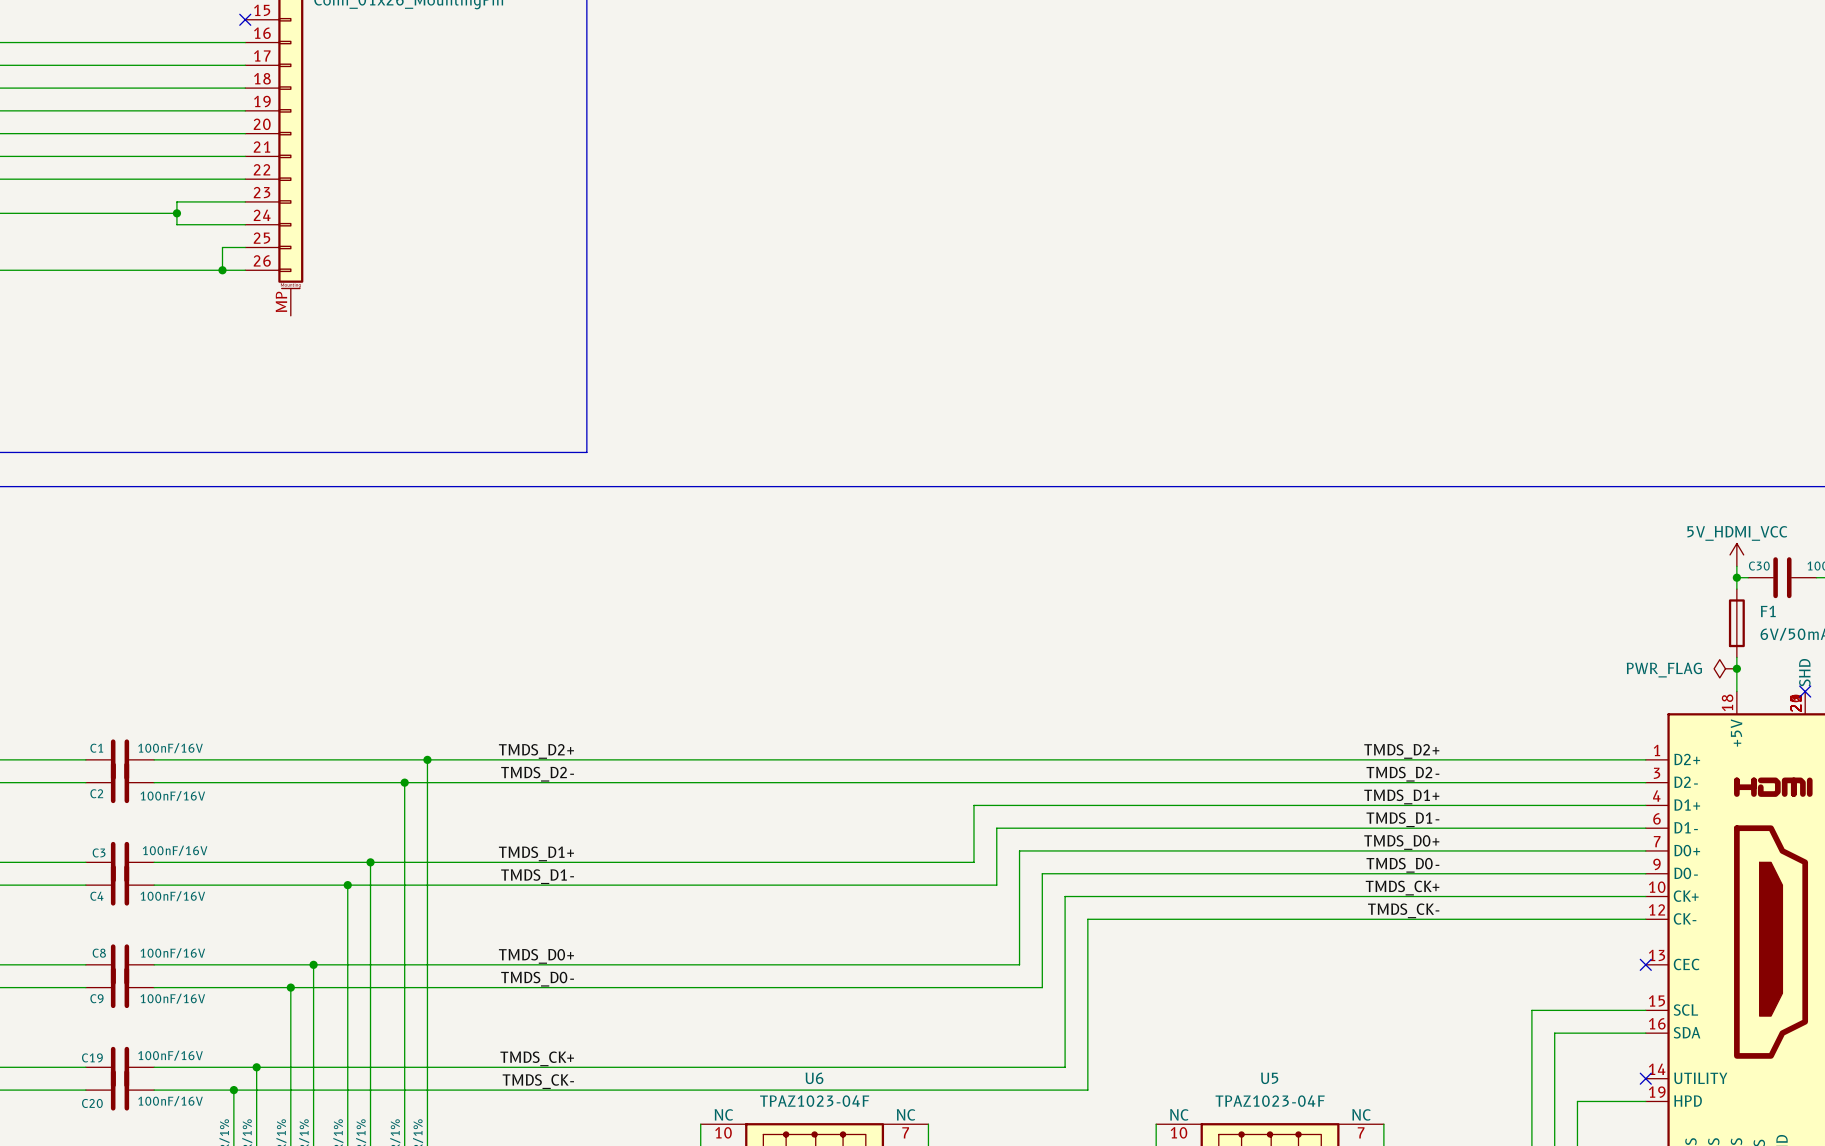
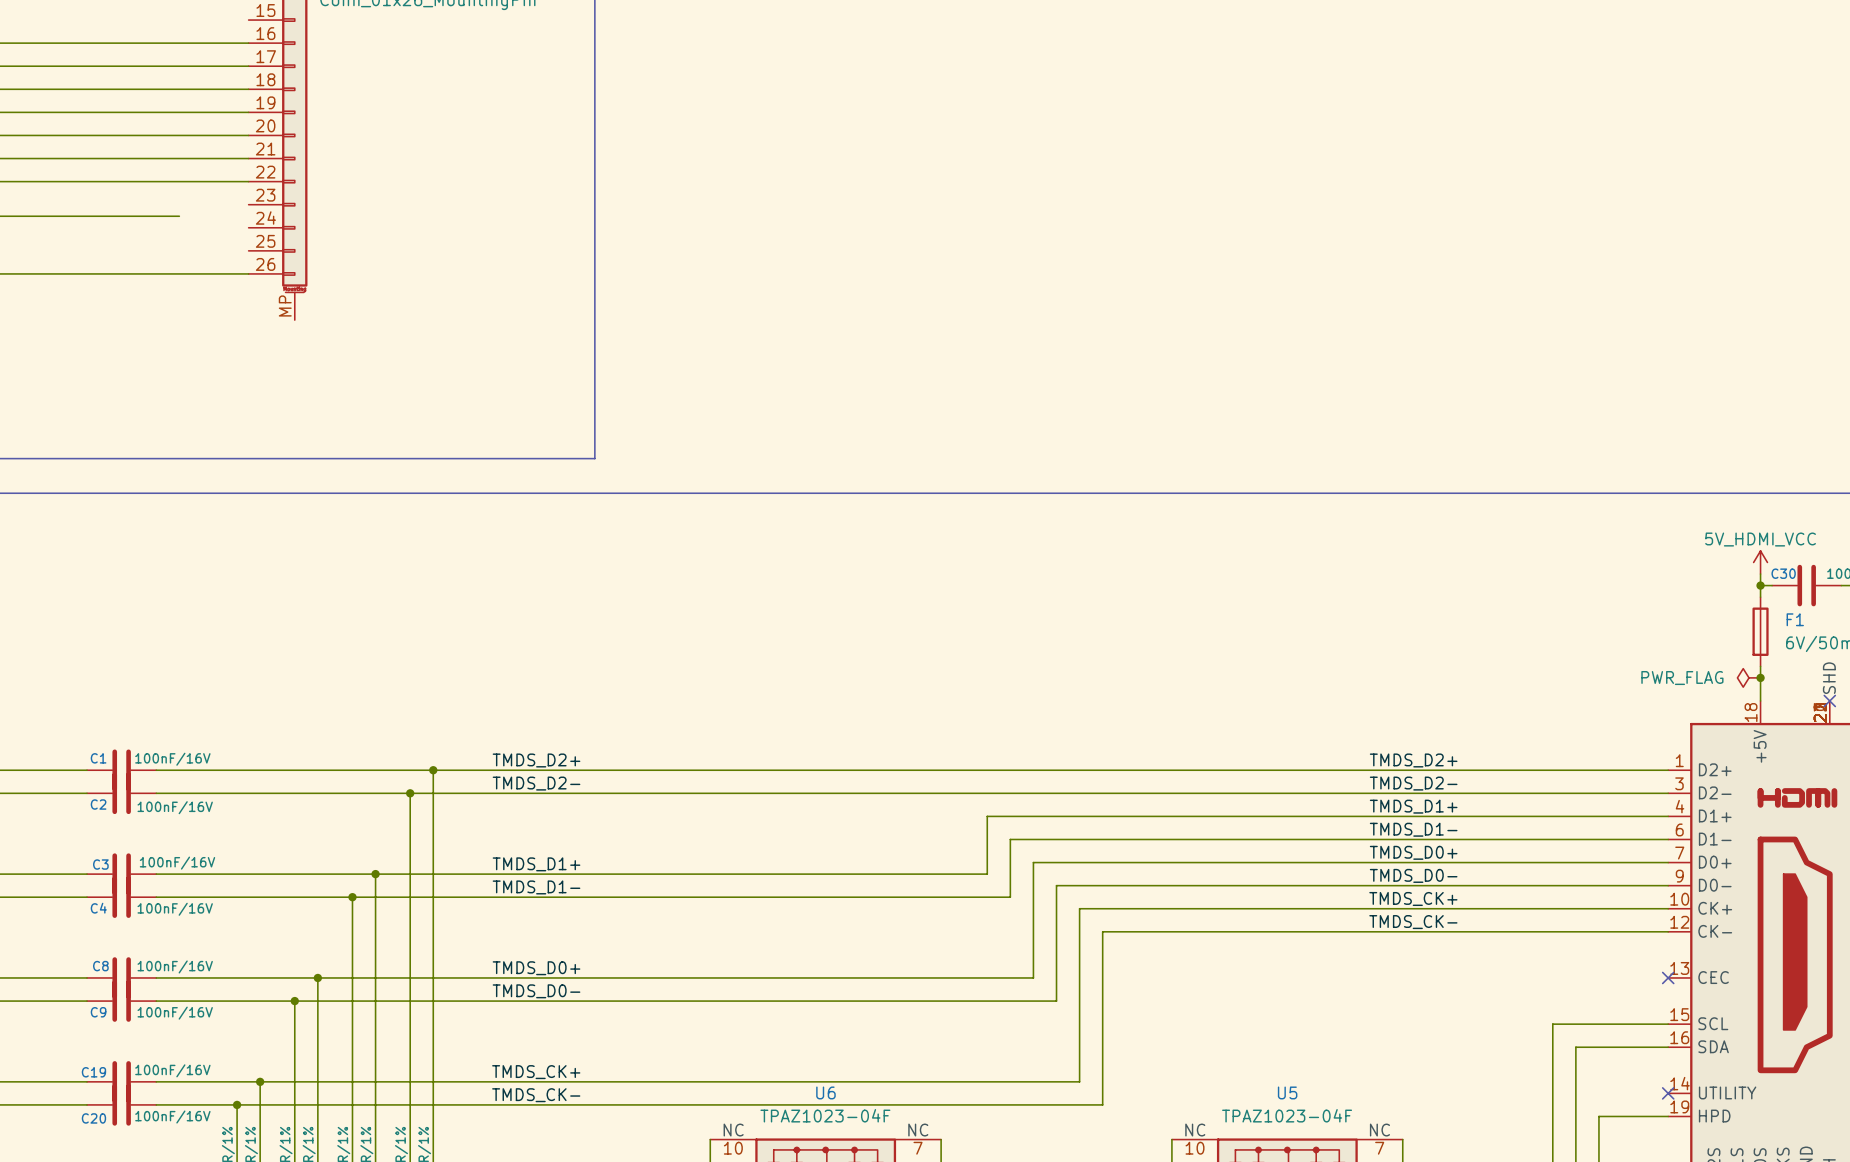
no-connect mark: (245, 19) -> none
wire: (245, 201) (176, 201) (176, 224) (245, 224) -> none
junction: (176, 213) -> none
wire: (245, 247) (222, 247) (222, 270) -> none
junction: (222, 270) -> none

